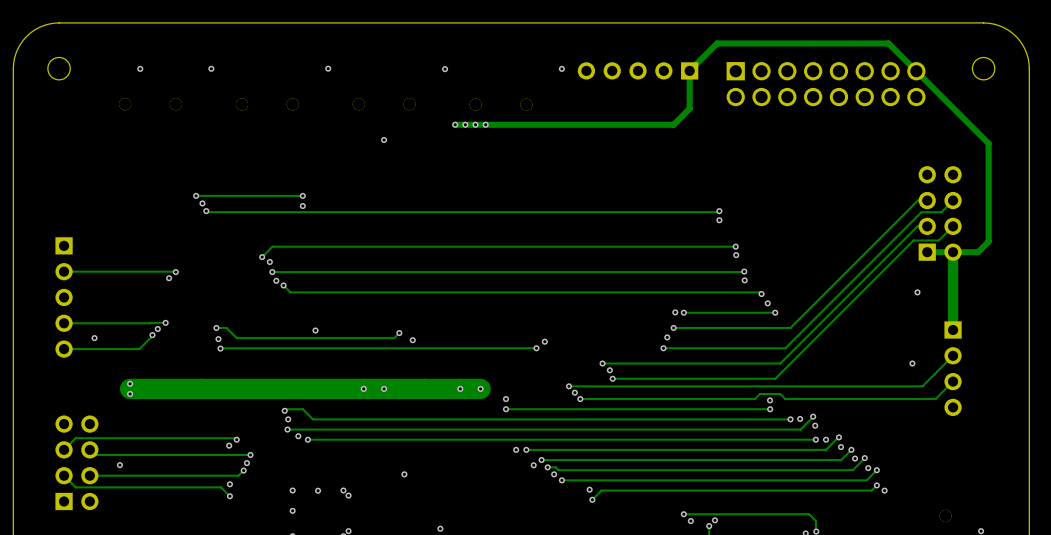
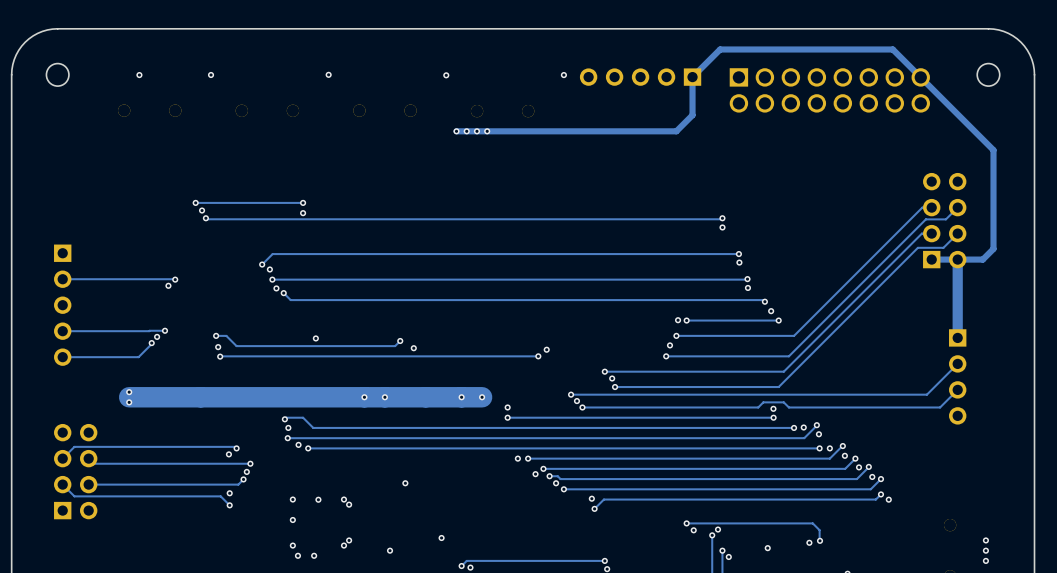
via: (384, 140) -> none
via: (917, 292) -> none
via: (94, 338) -> none
via: (912, 363) -> none
via: (119, 465) -> none

